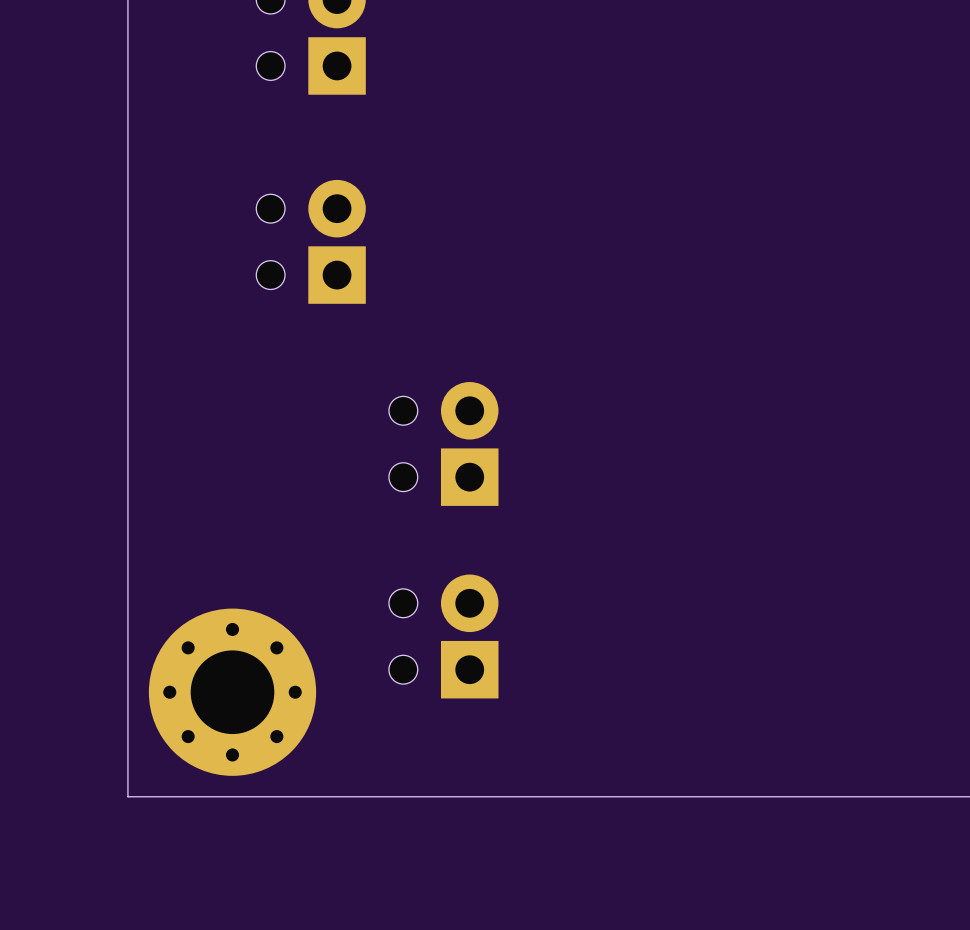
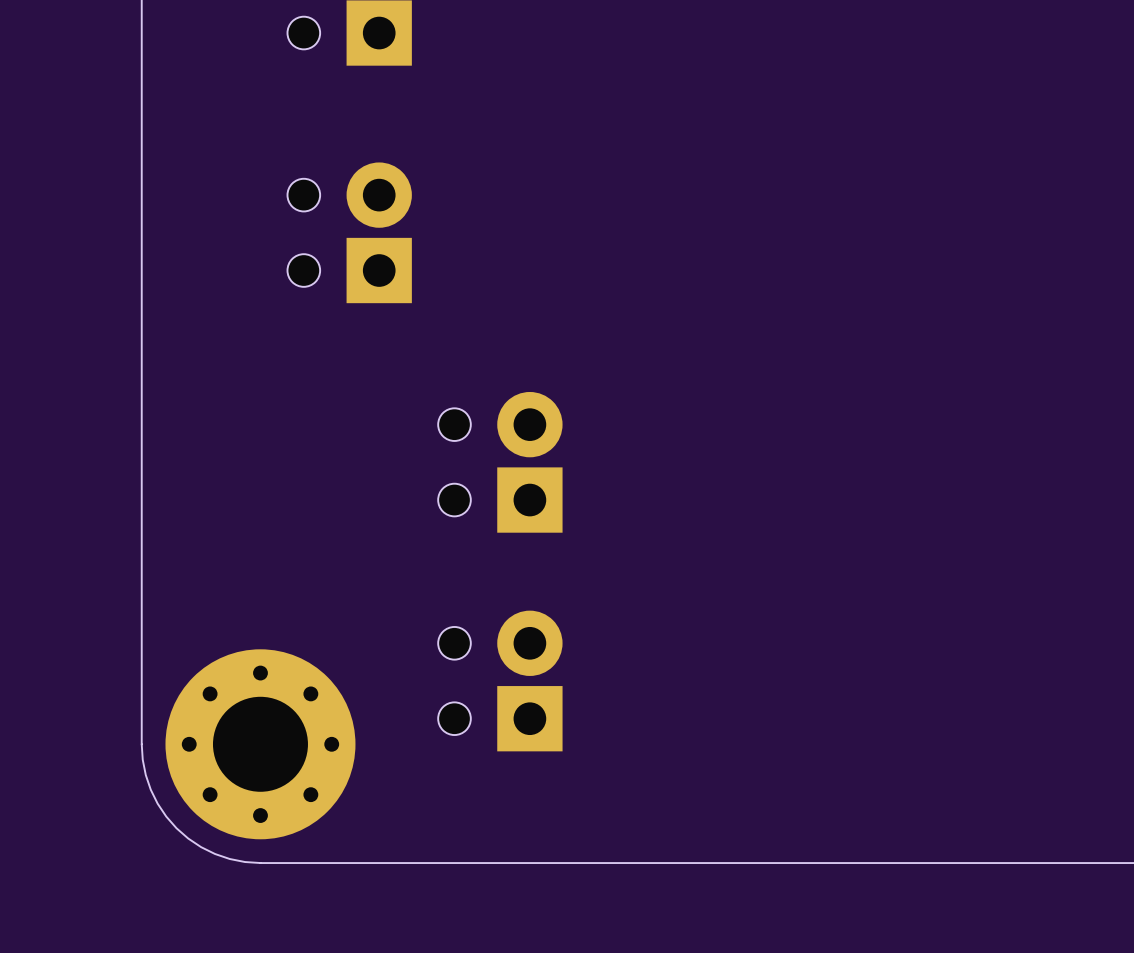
board edge: (127, 692) (127, 796) (232, 796) -> (141, 744) (145, 775) (150, 789) (157, 803) (176, 828) (201, 847) (215, 853) (229, 858) (260, 863)

